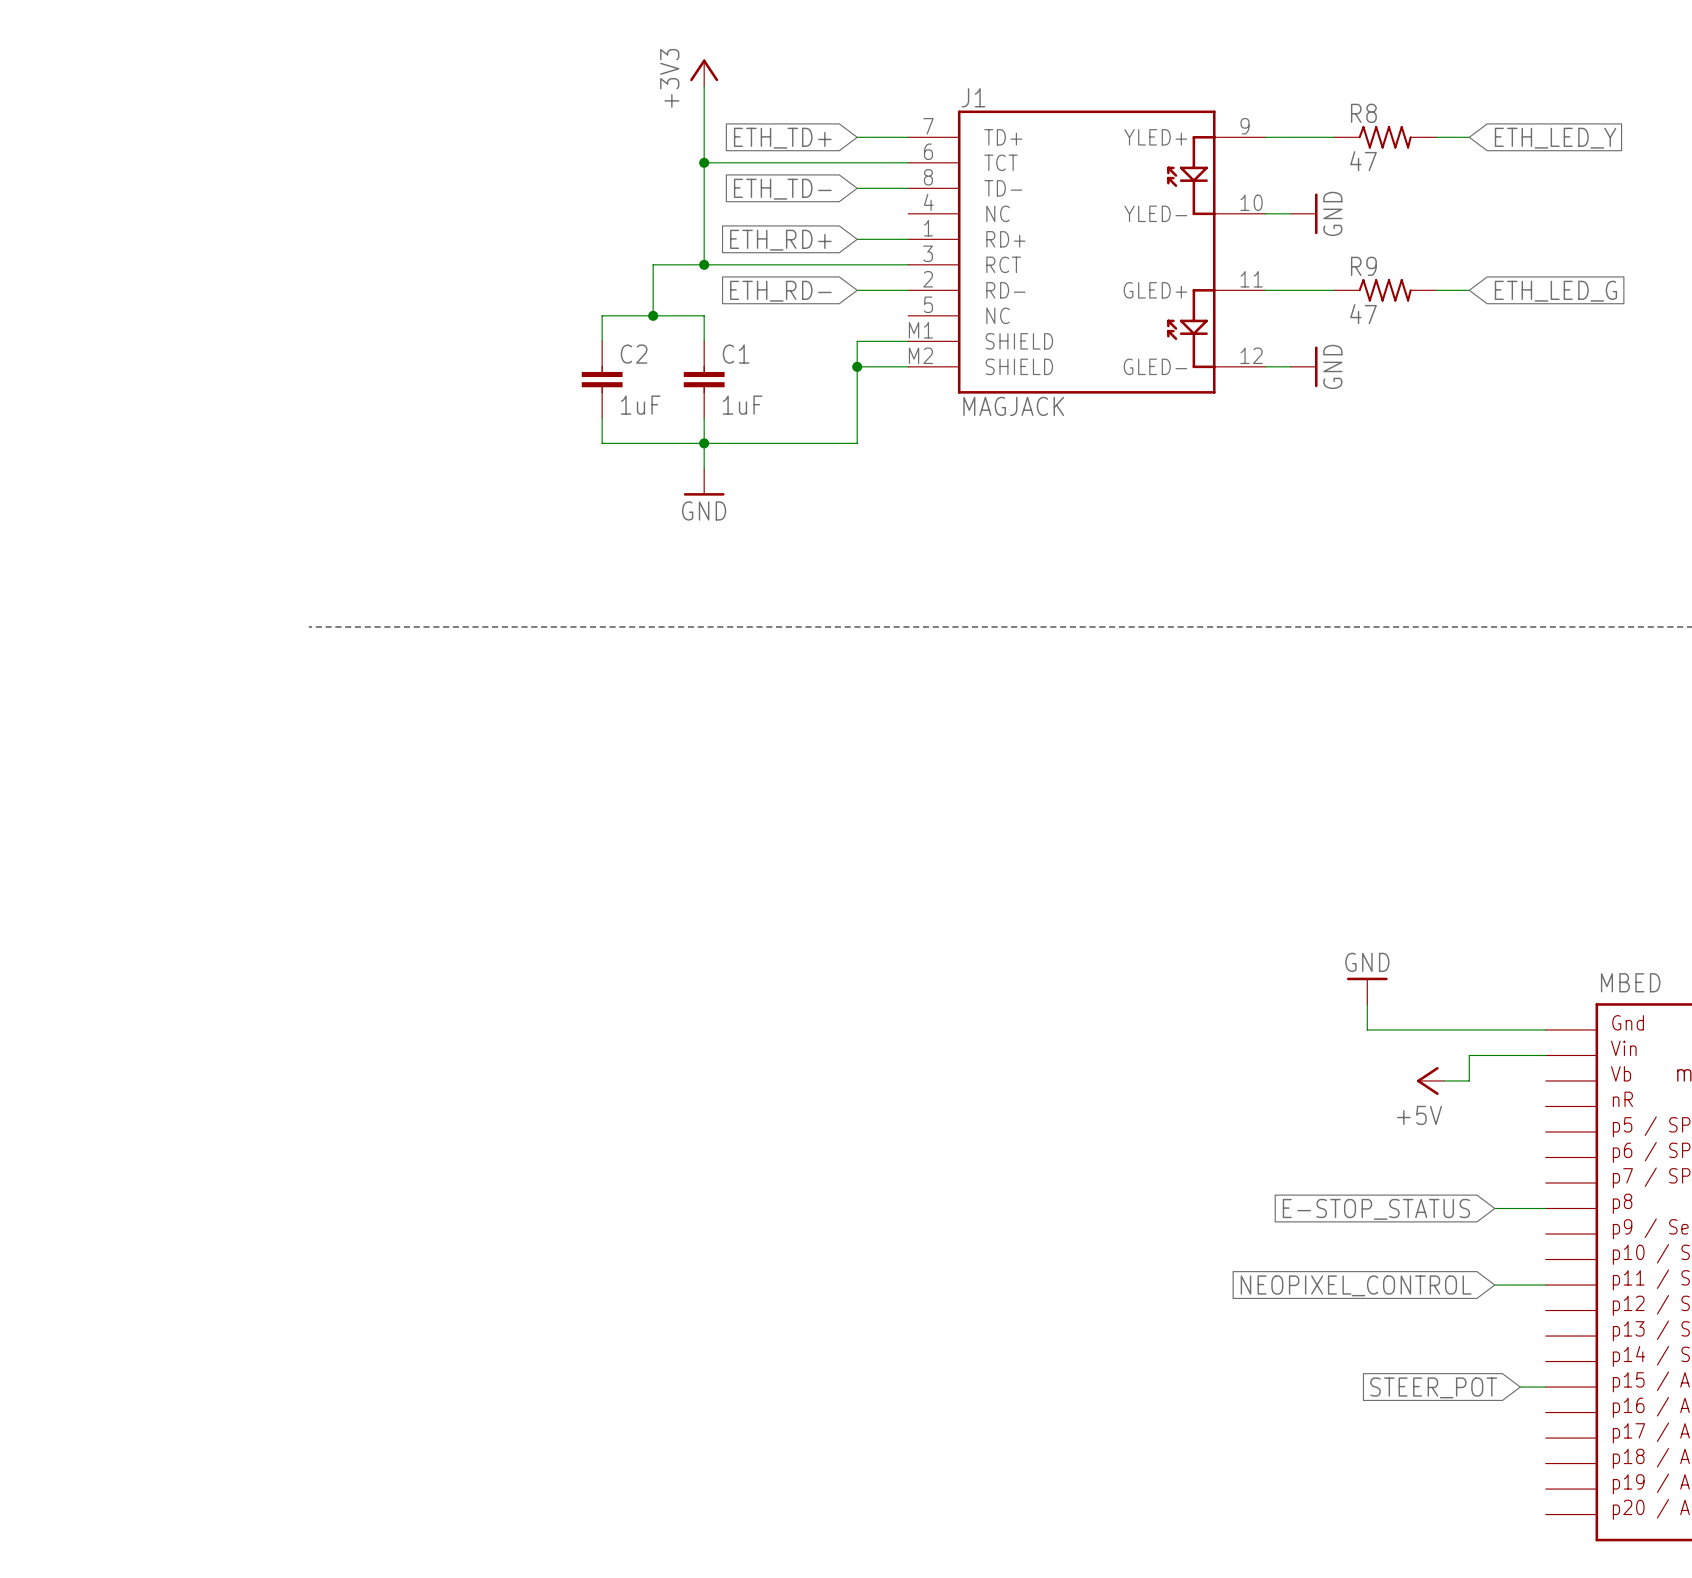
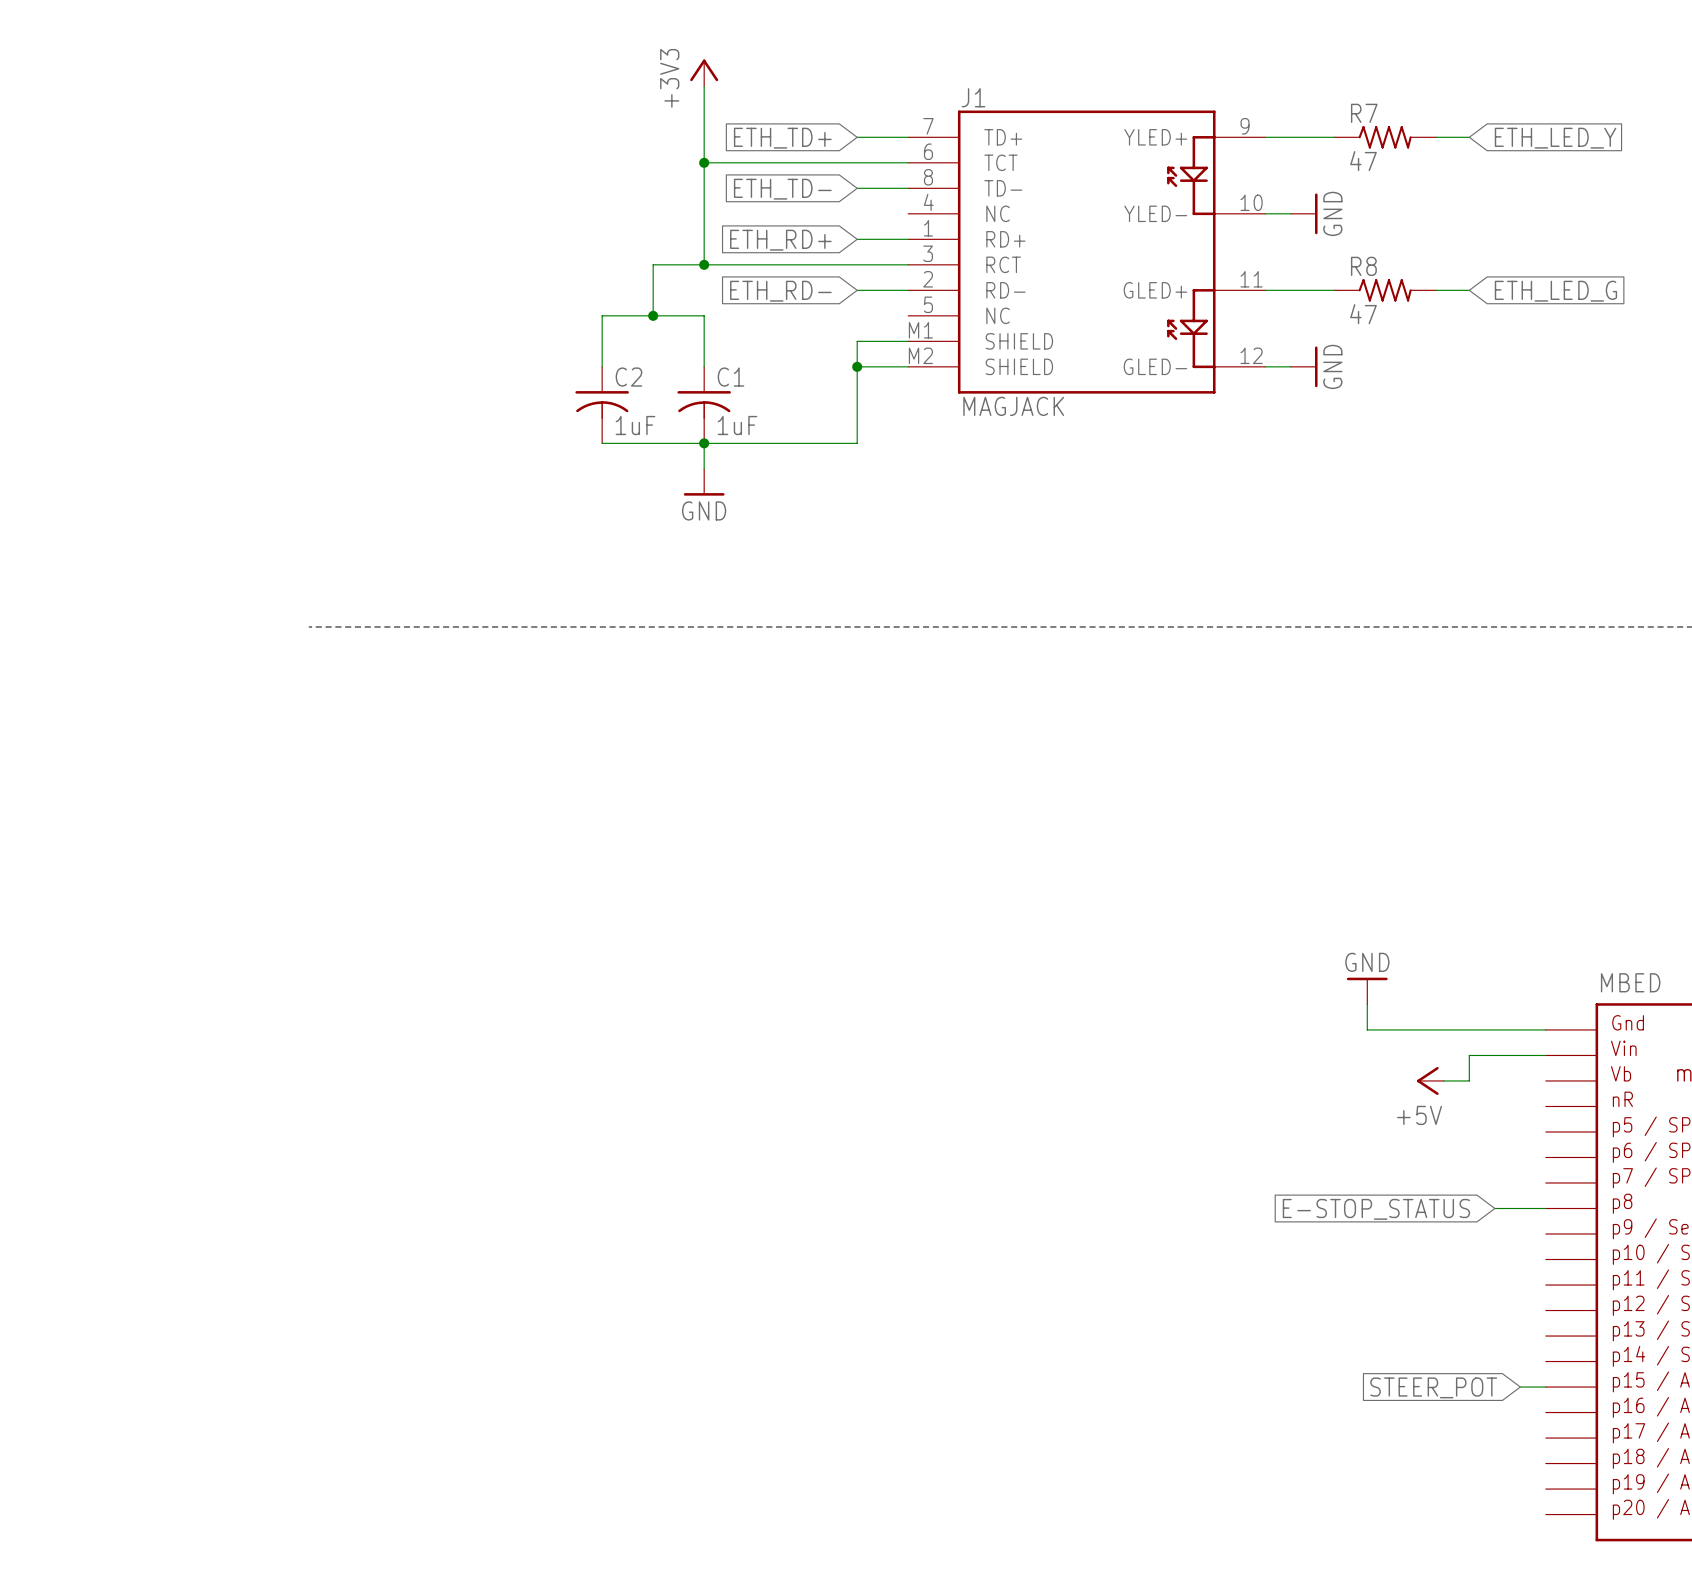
R8 name: R8 (1363, 113) -> R7 (1364, 113)
R9 name: R9 (1363, 266) -> R8 (1363, 266)
C2 symbol: [581, 341, 623, 418] -> [575, 366, 629, 444]
C1 symbol: [683, 341, 725, 418] -> [677, 366, 731, 444]
global label: NEOPIXEL_CONTROL (1356, 1285) -> none
wire: (1494, 1285) (1545, 1285) -> none

